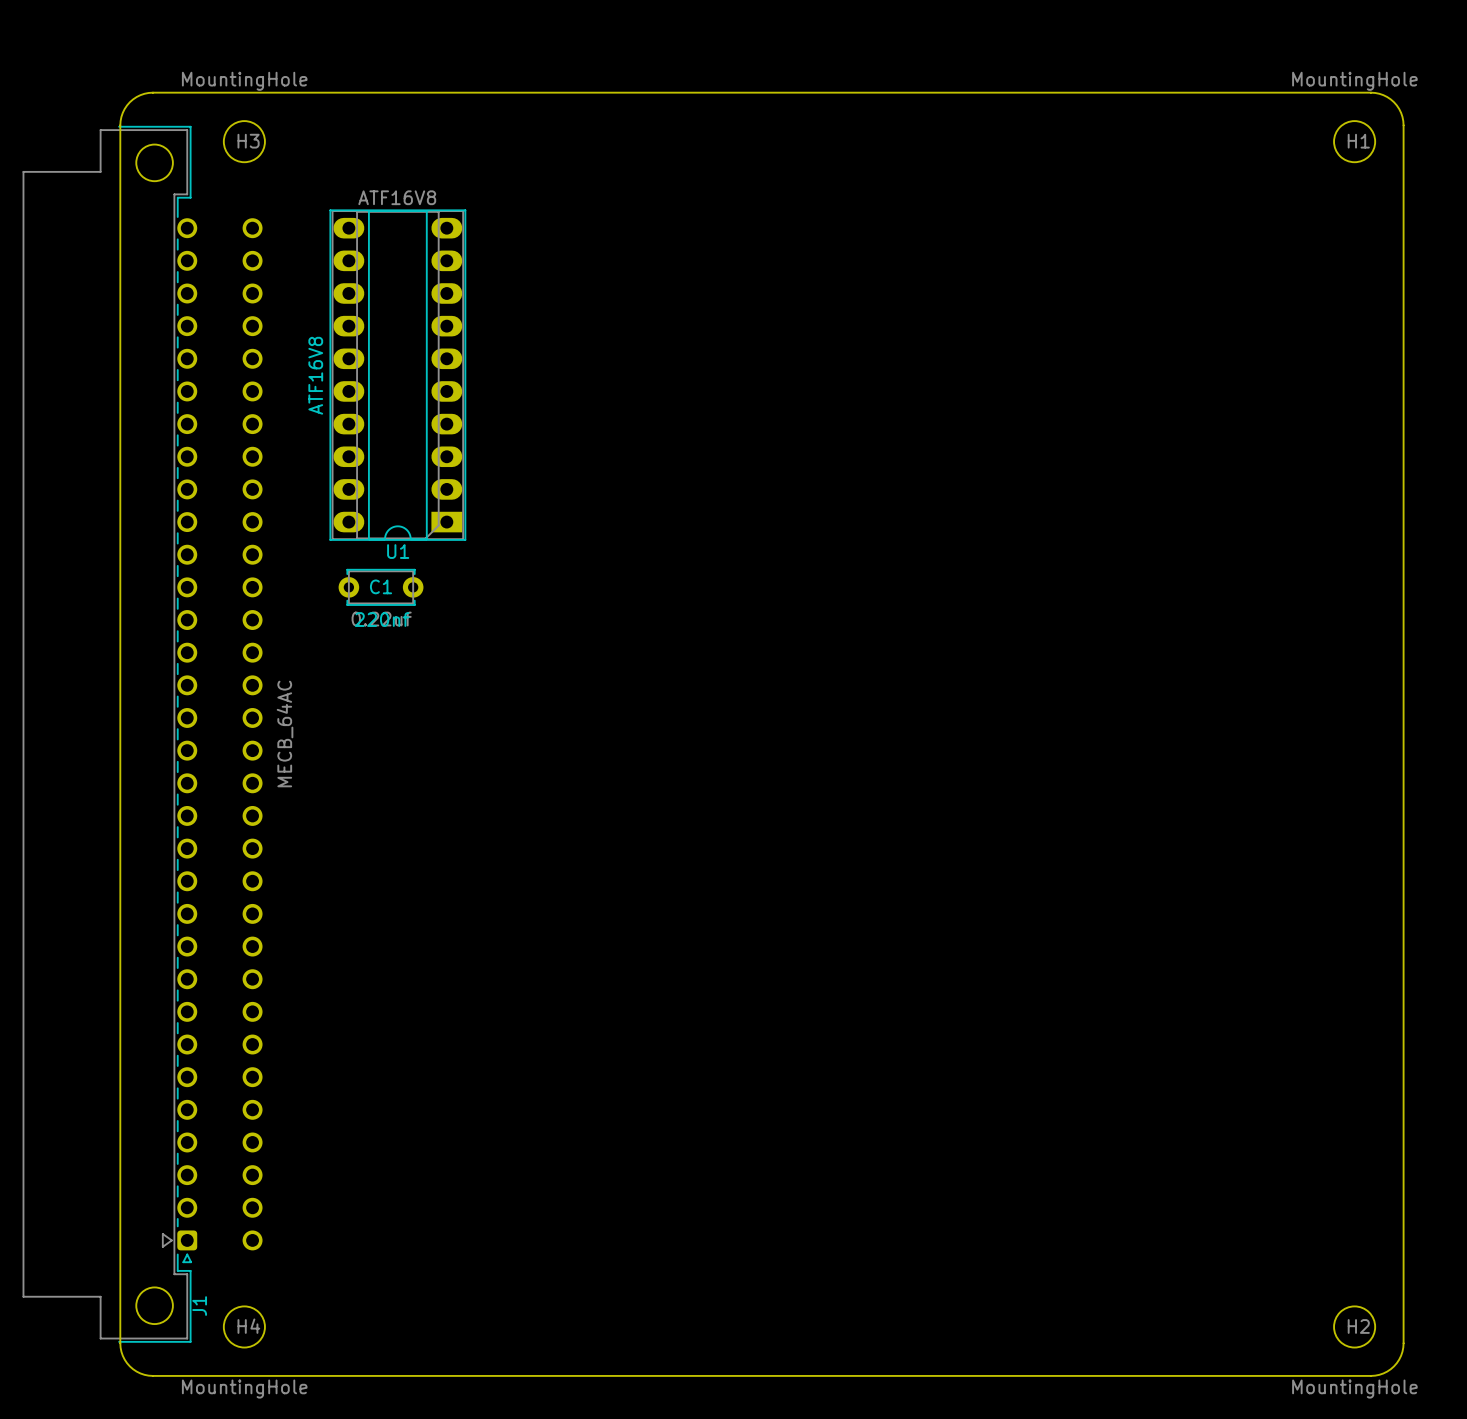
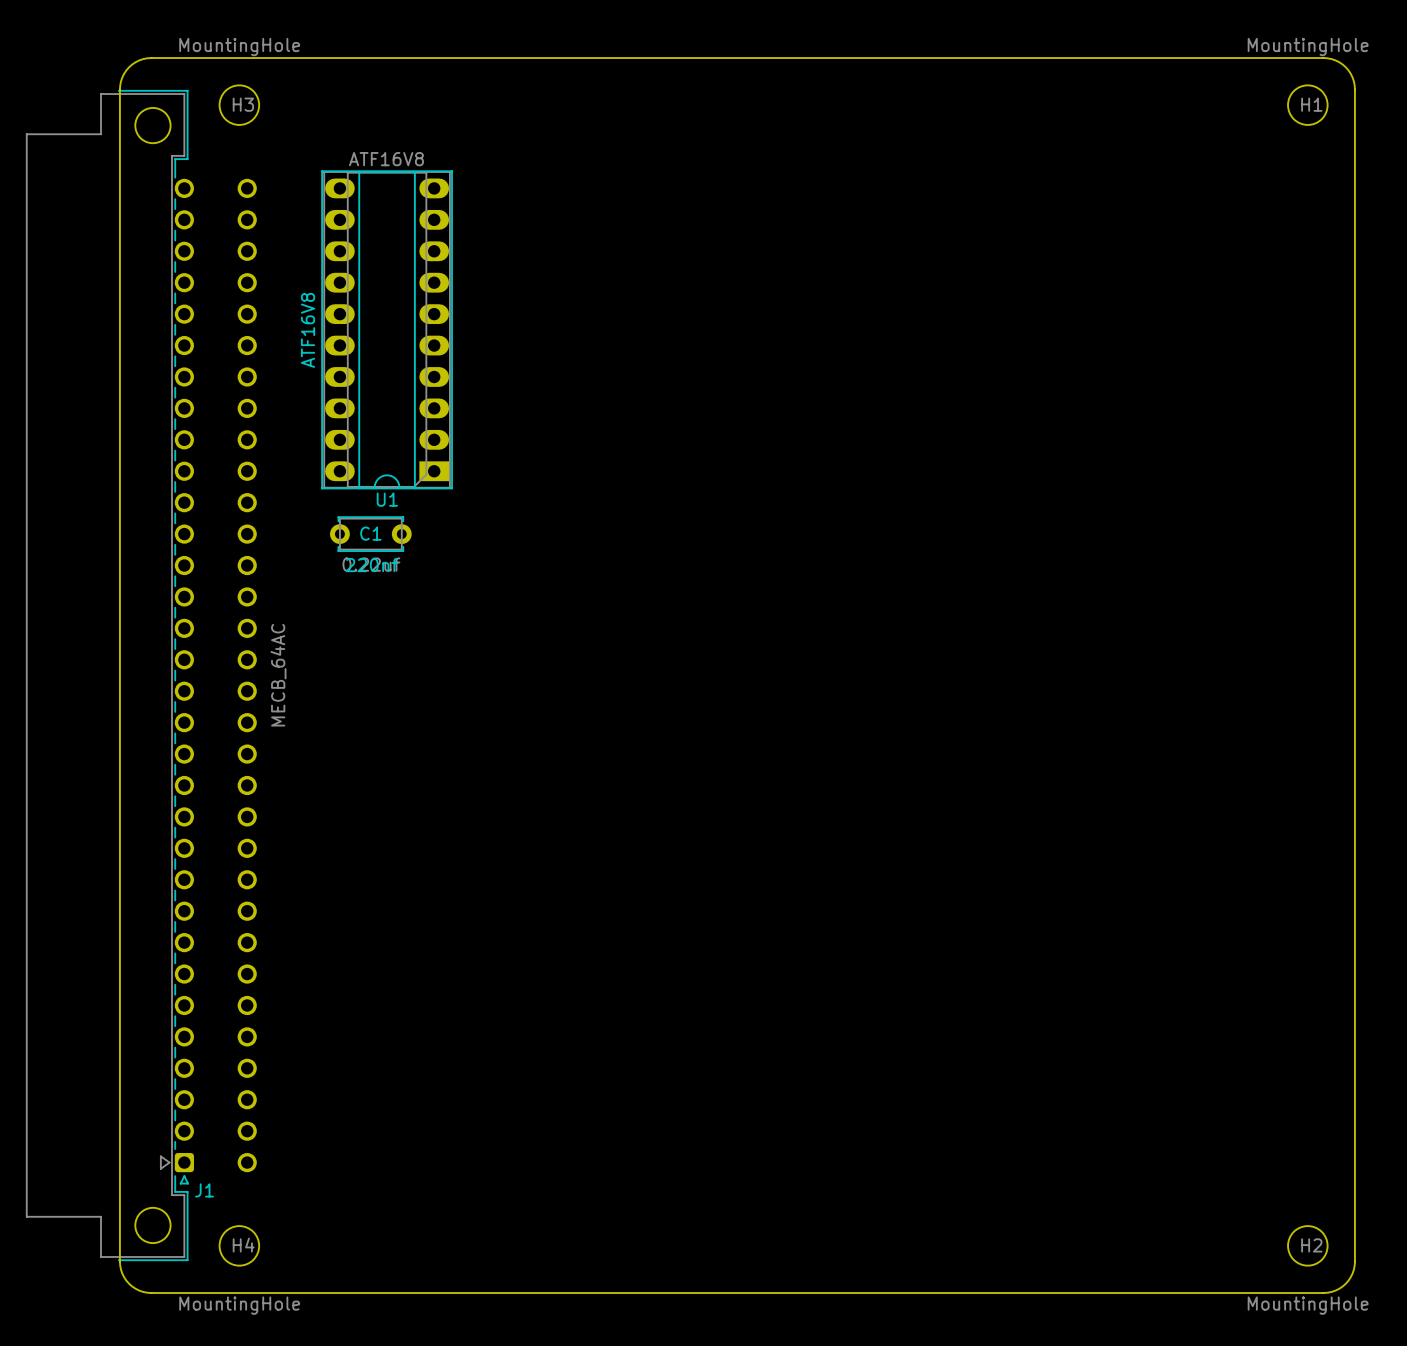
J1 name rotation: 0° (199, 1306) -> 90° clockwise (204, 1190)
J1 name position: J1 (199, 1306) -> J1 (204, 1190)

